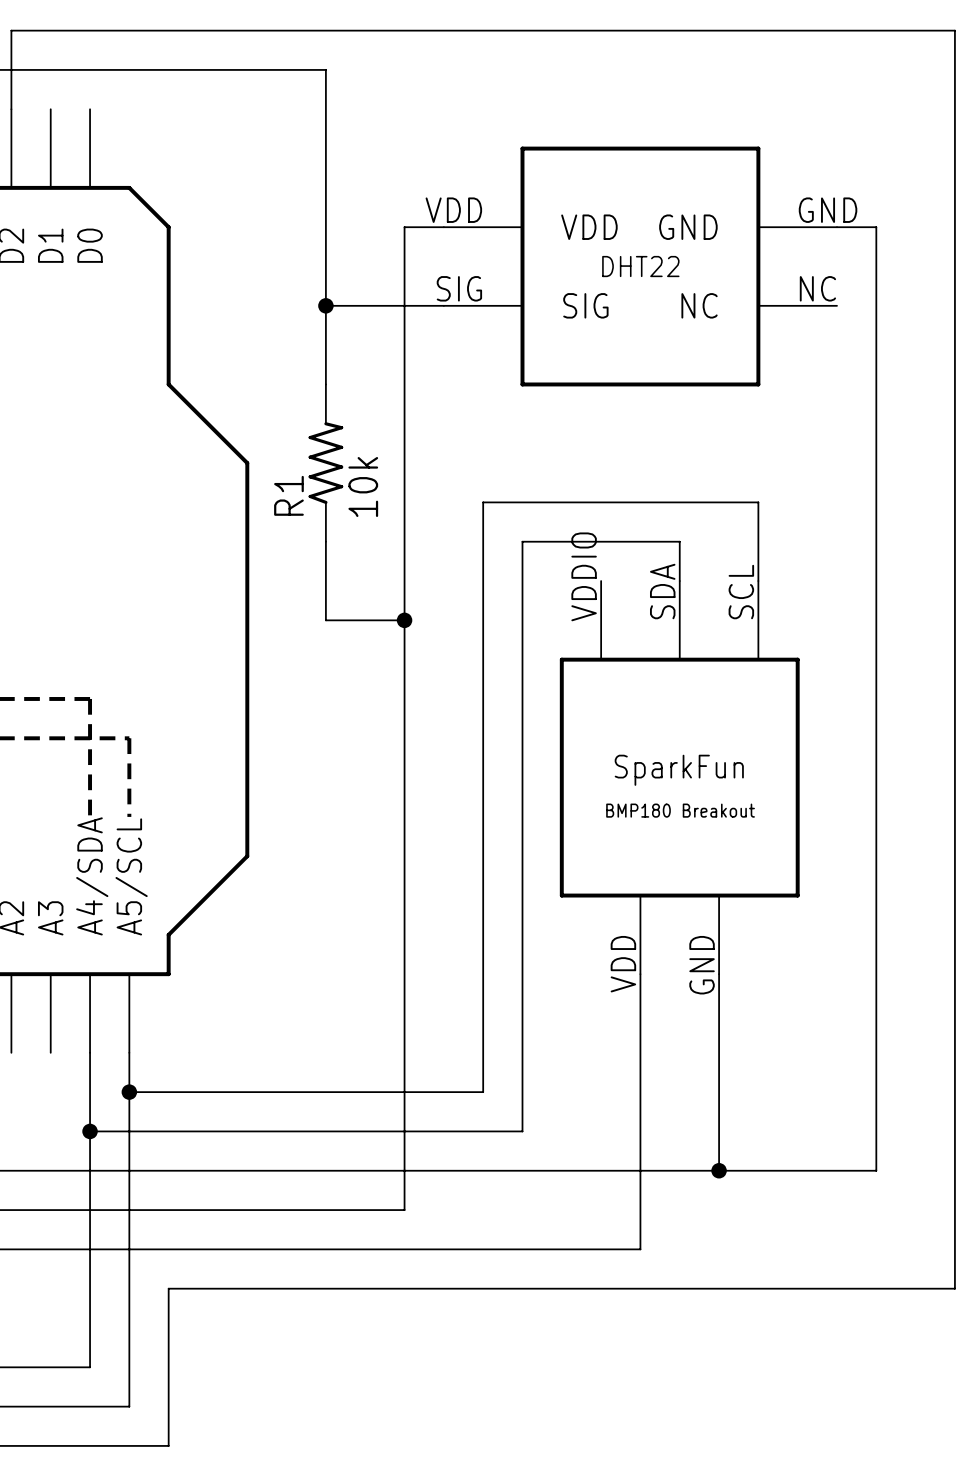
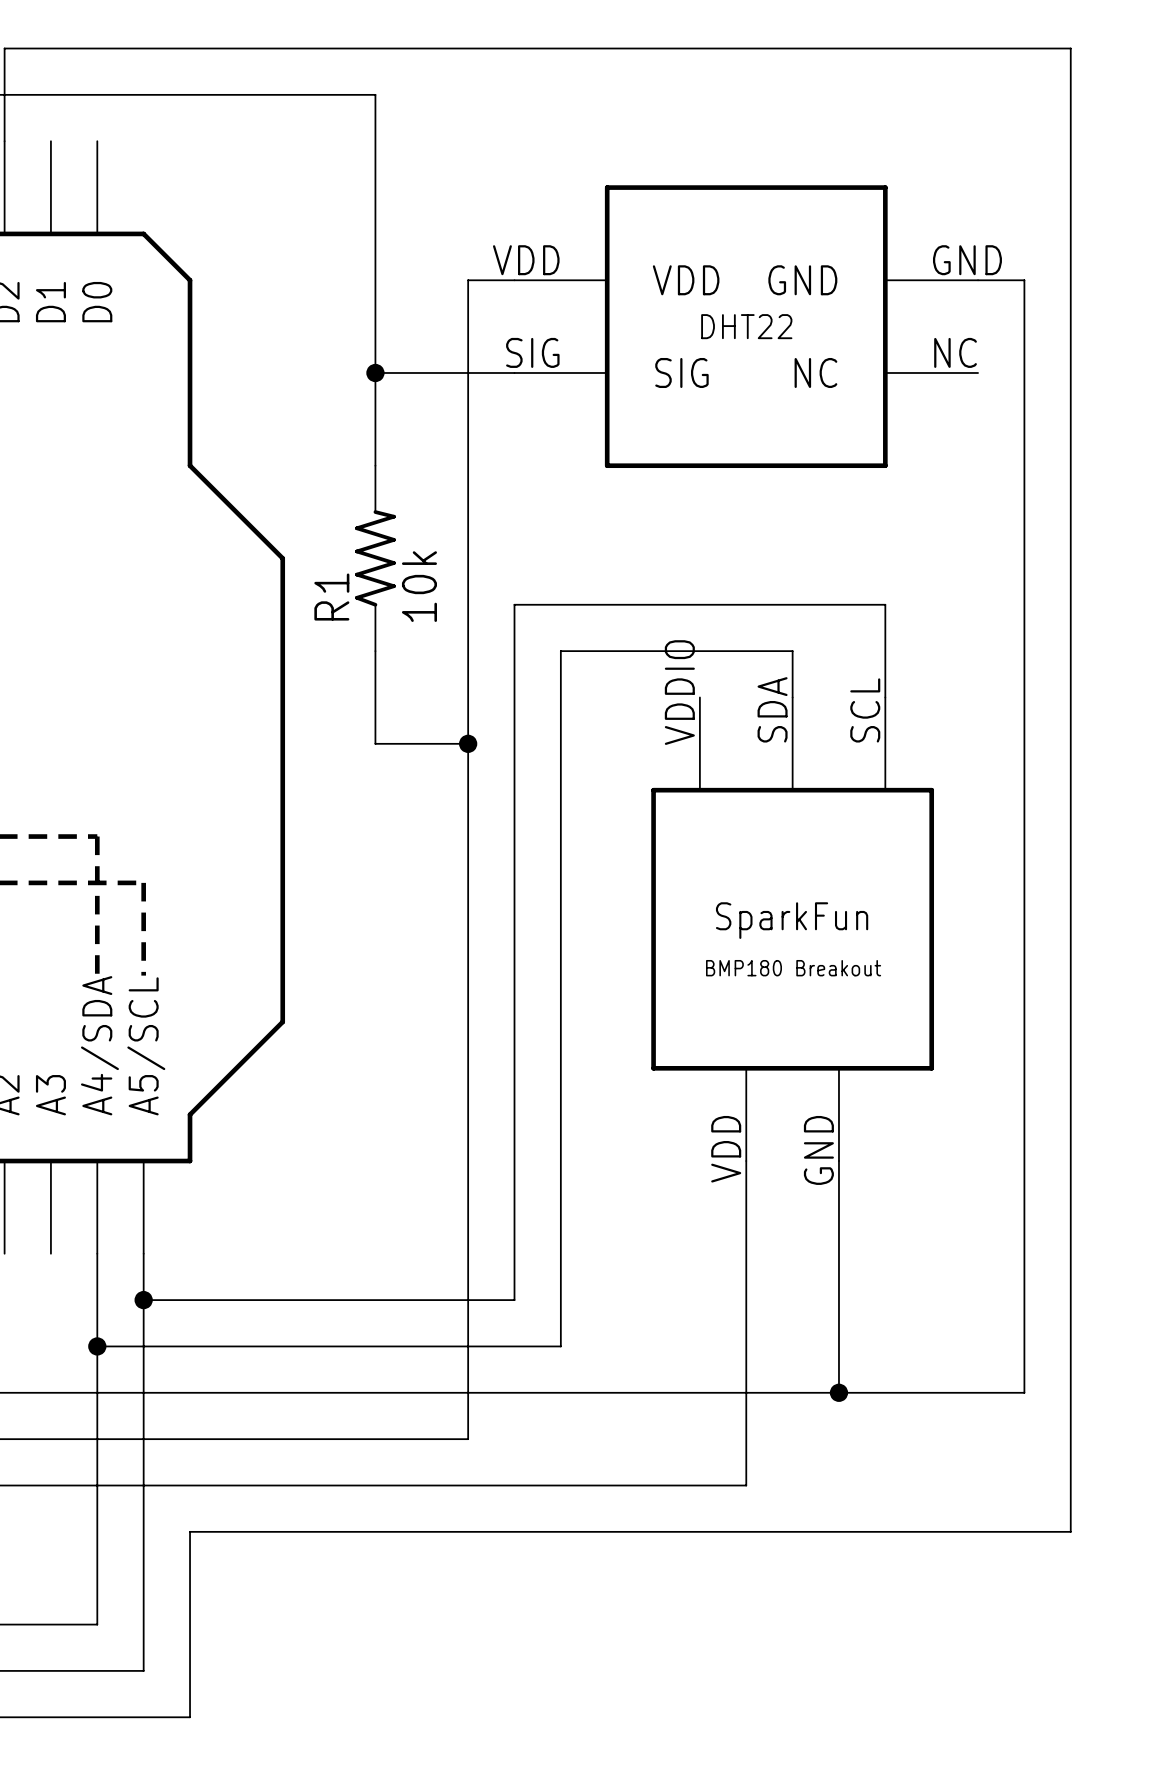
wire: (915, 30) (954, 30) (954, 1288) (915, 1288) -> (1070, 48) (1070, 1531)
wire: (483, 502) (483, 541) -> (607, 651) (560, 651)
wire: none -> (560, 604) (514, 604) (514, 1300)
wire: (522, 541) (522, 1131) (483, 1131) -> none
wire: (443, 1092) (483, 1092) -> (560, 1346) (560, 1300)

